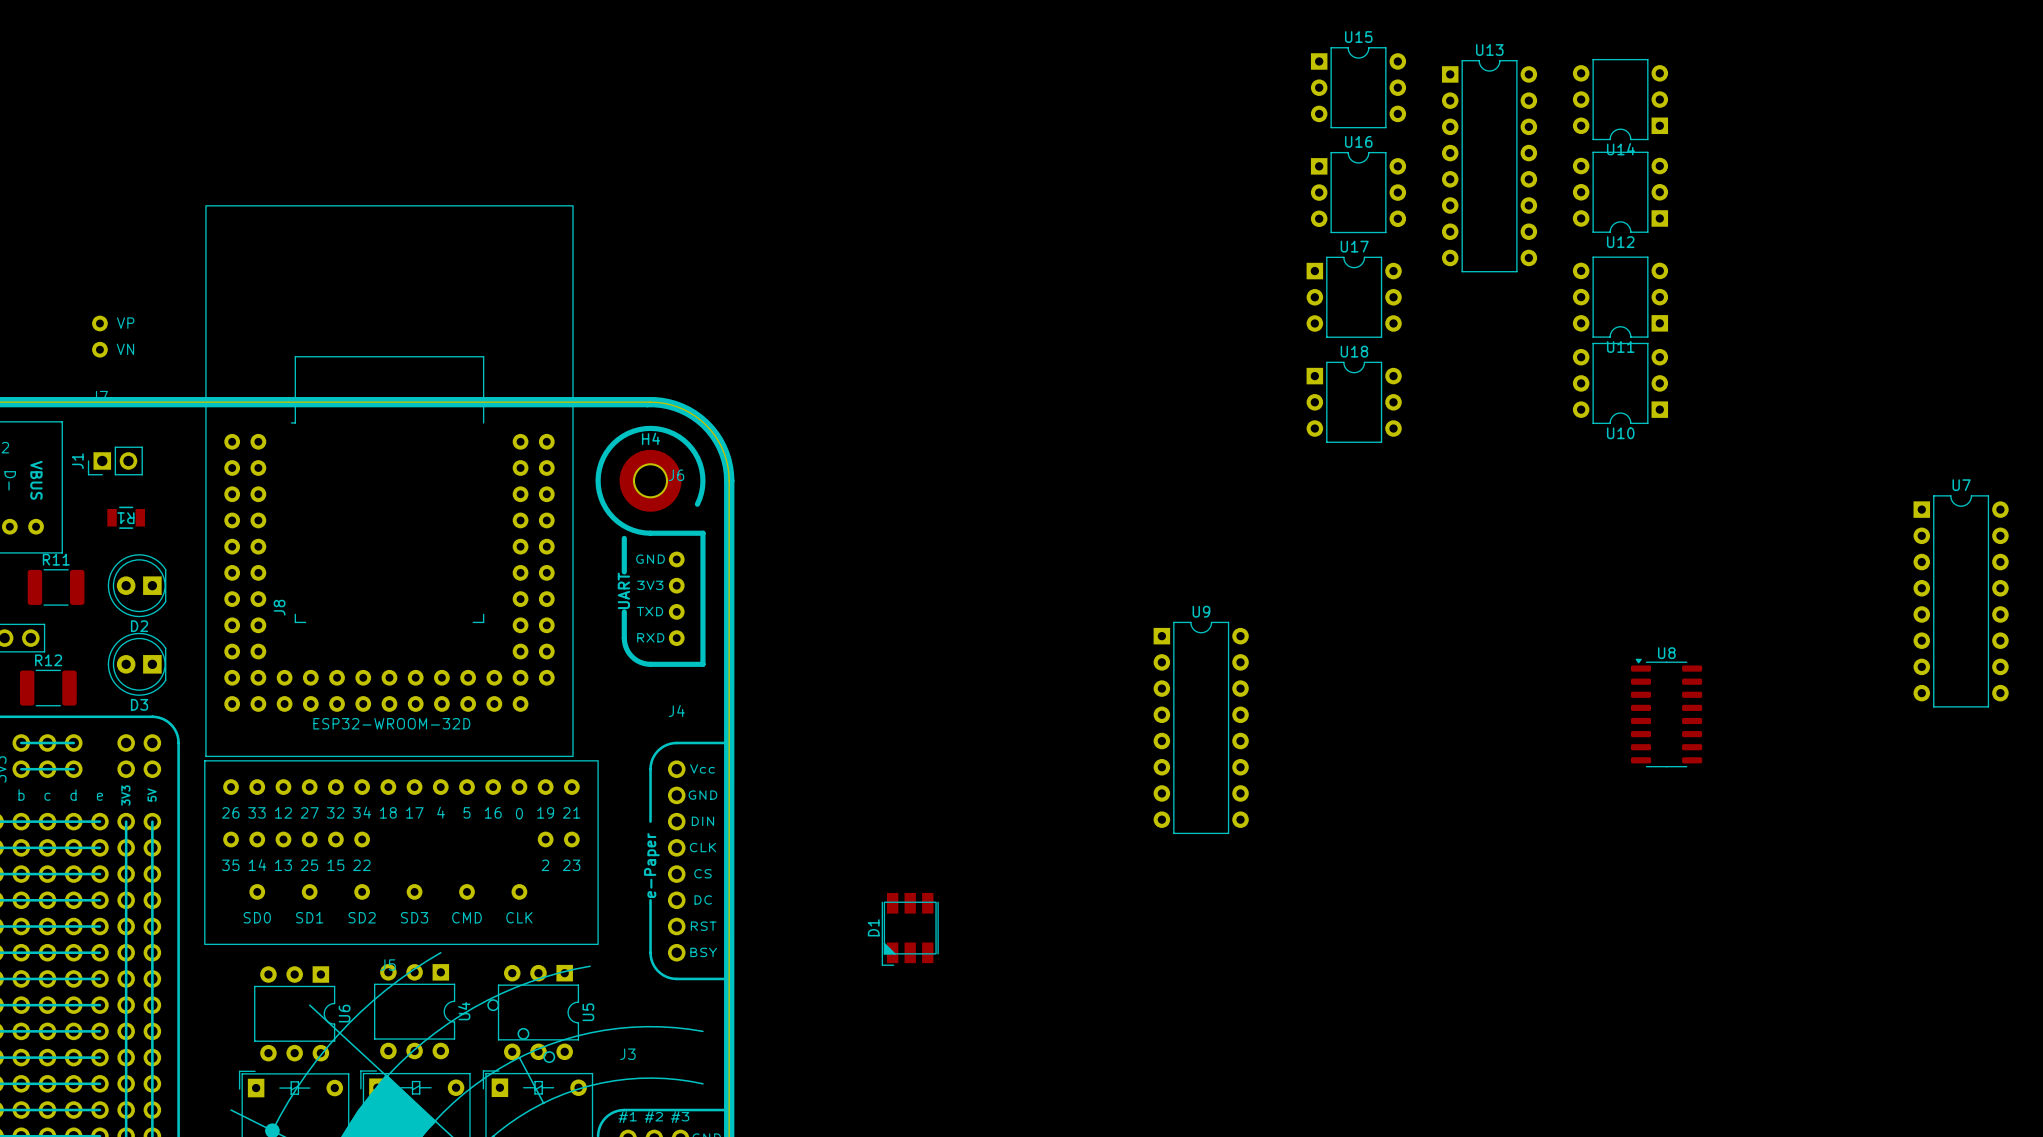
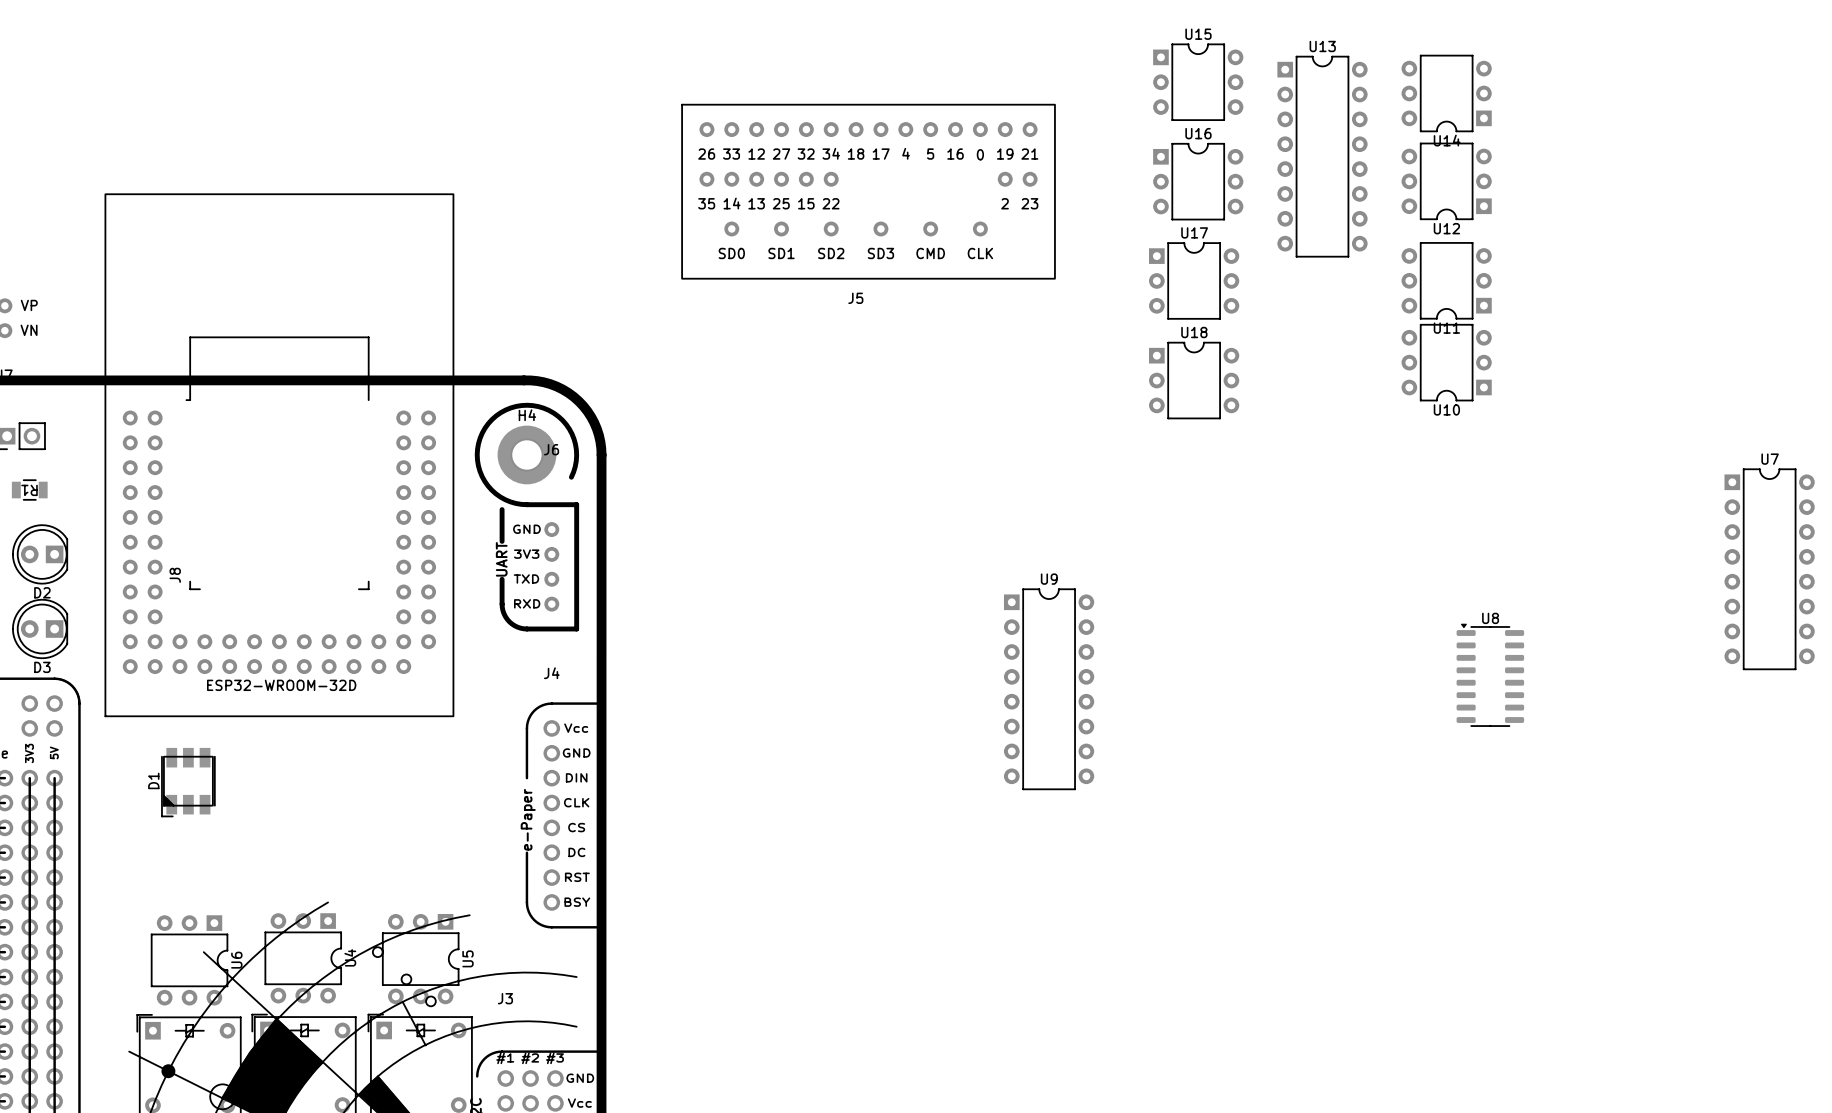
J5 position: (401, 852) -> (868, 191)
D1 position: (910, 929) -> (188, 782)

